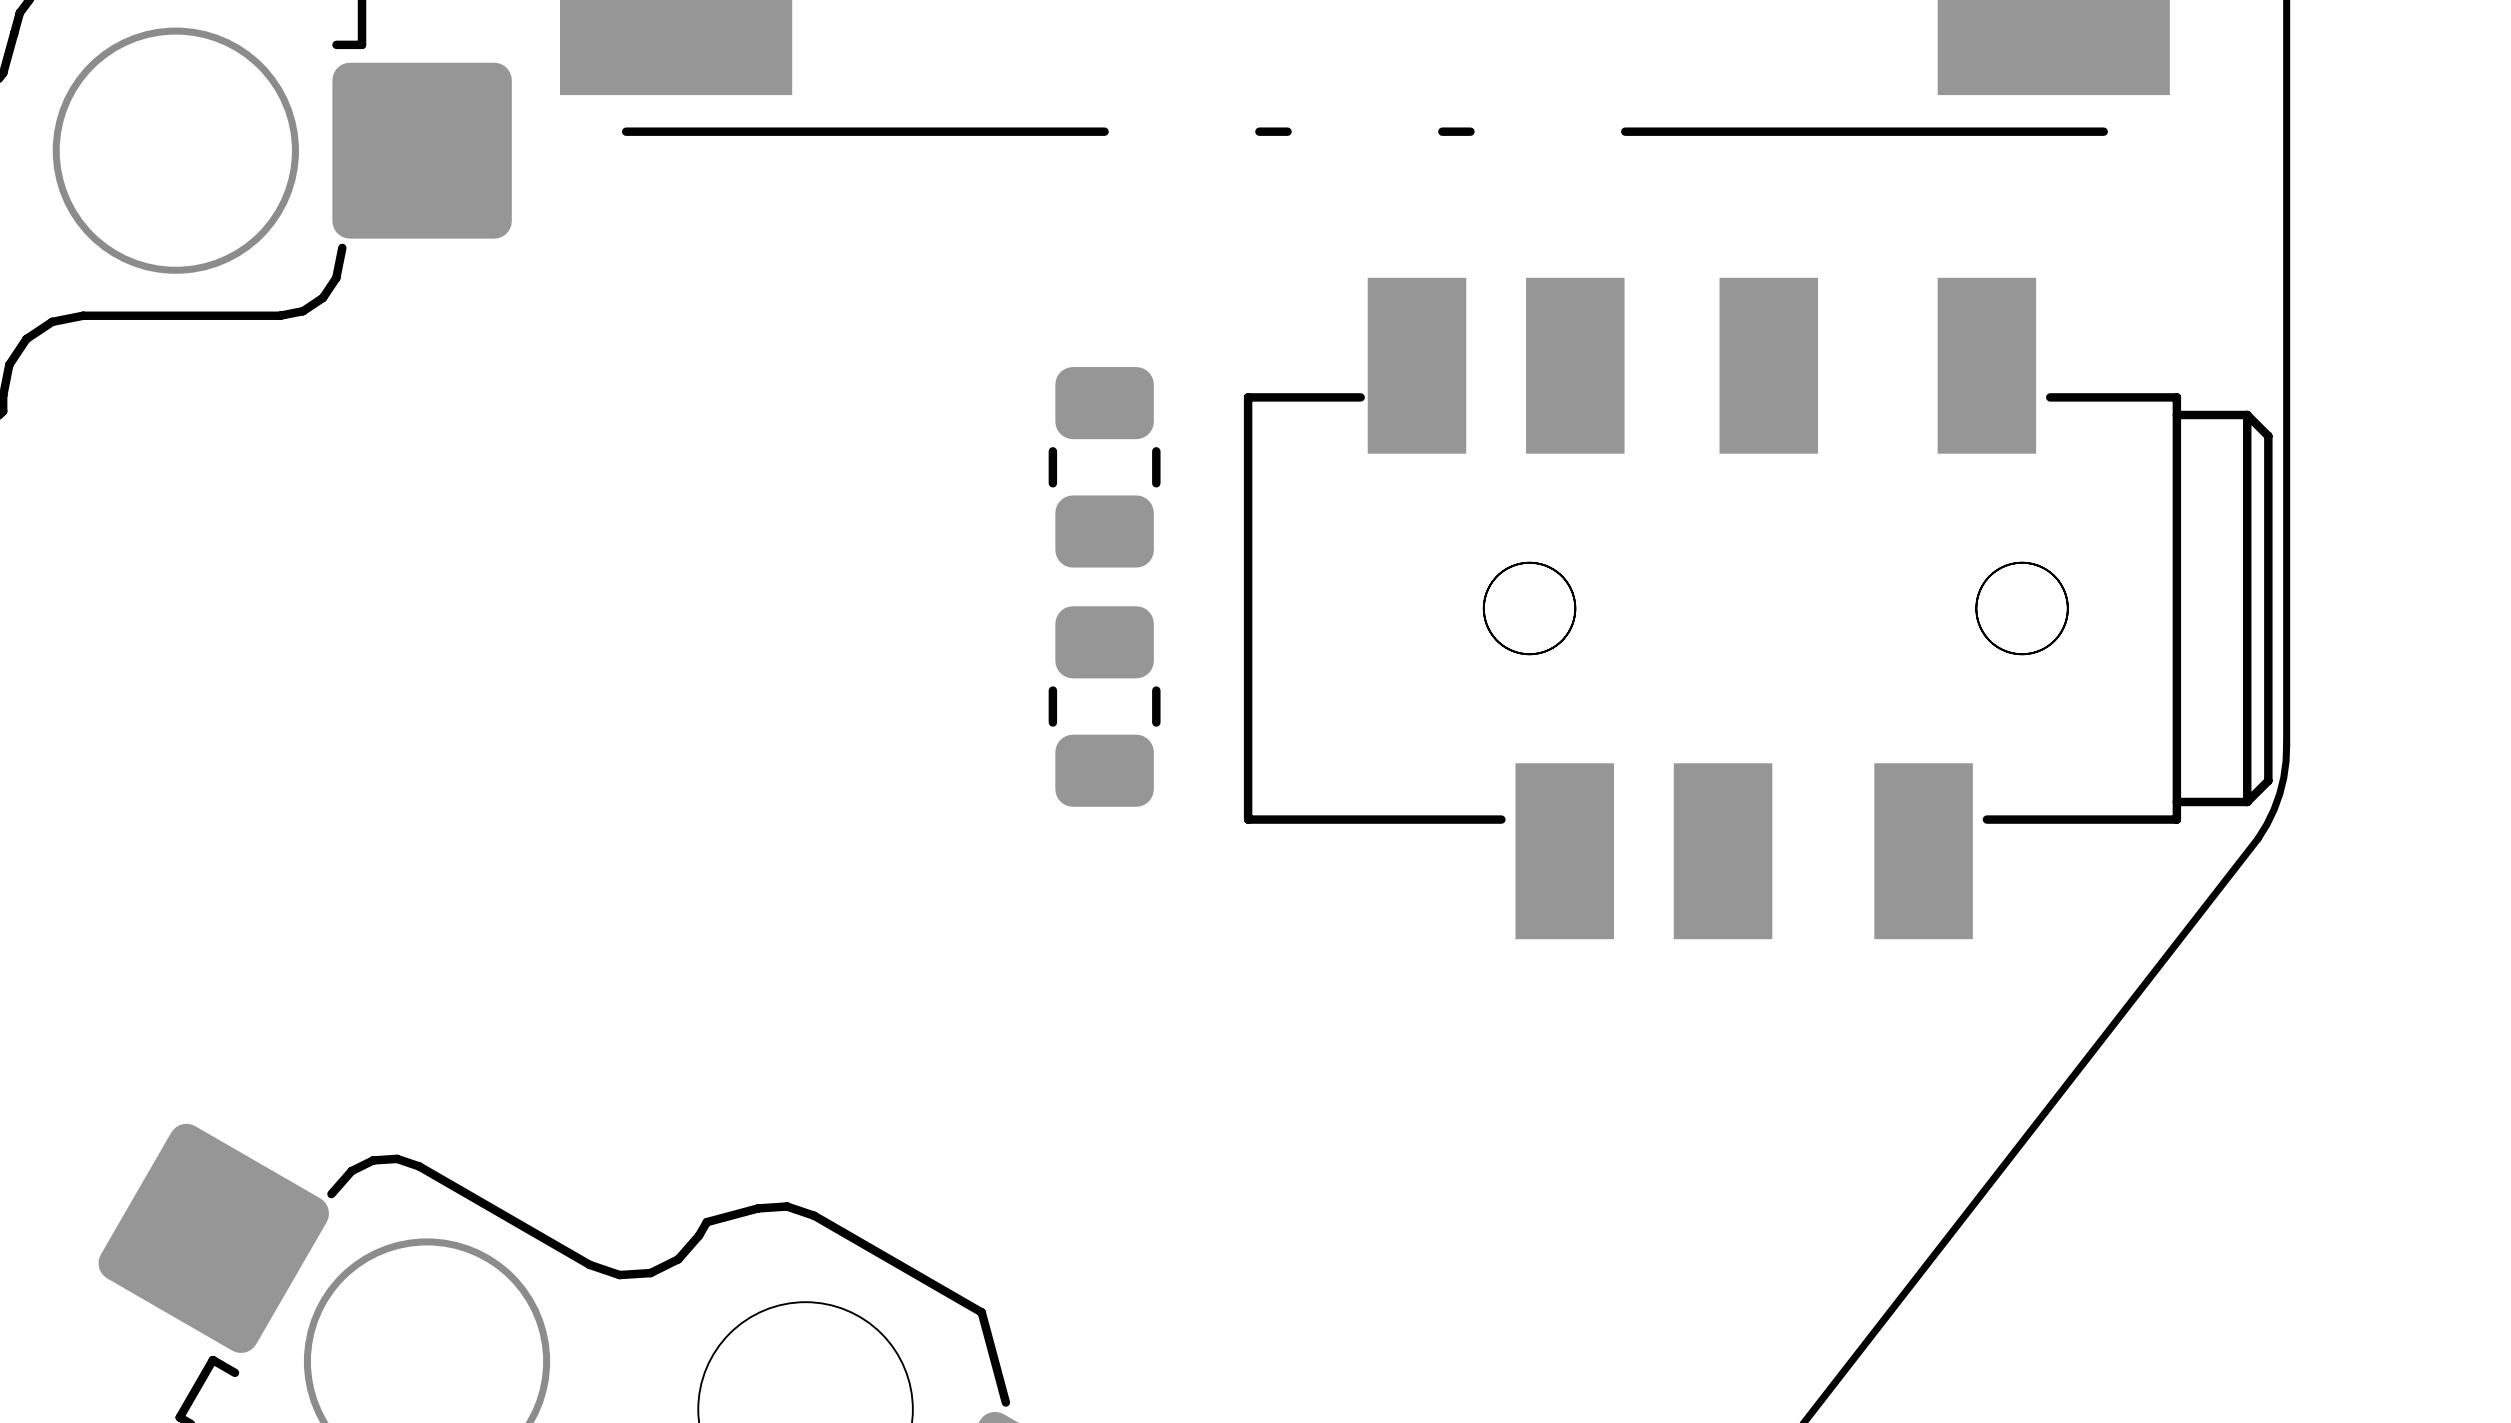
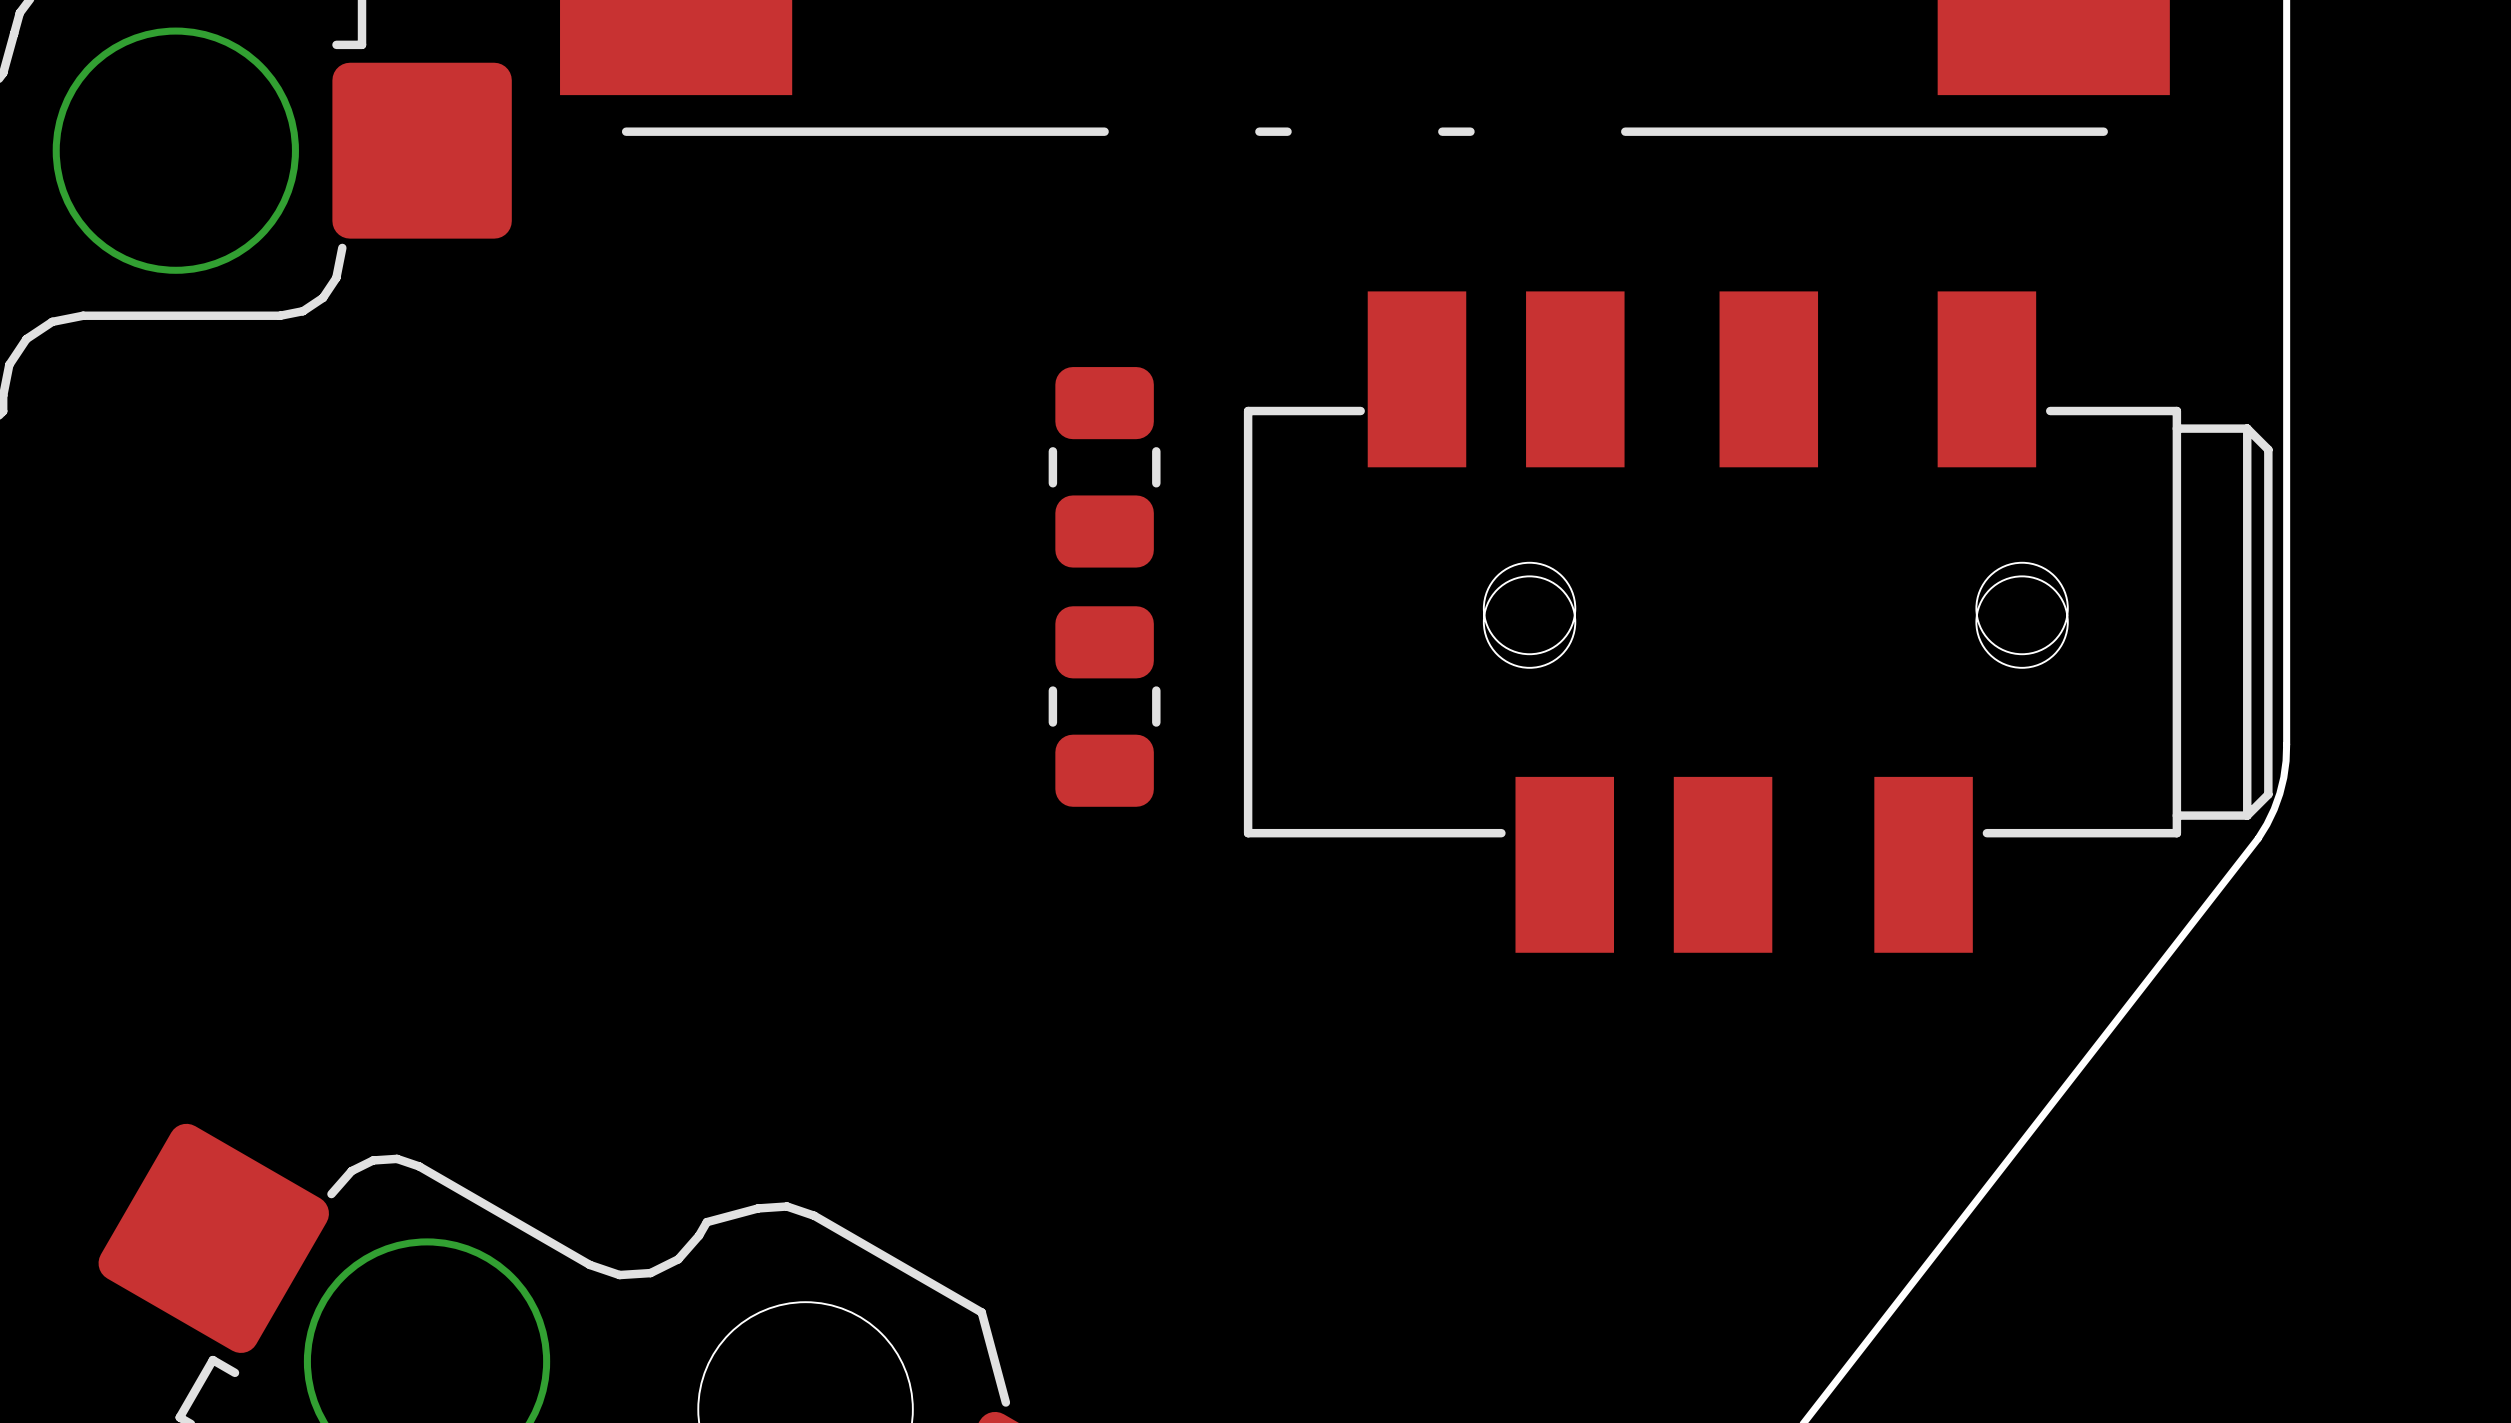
part position: (1758, 608) -> (1758, 622)

